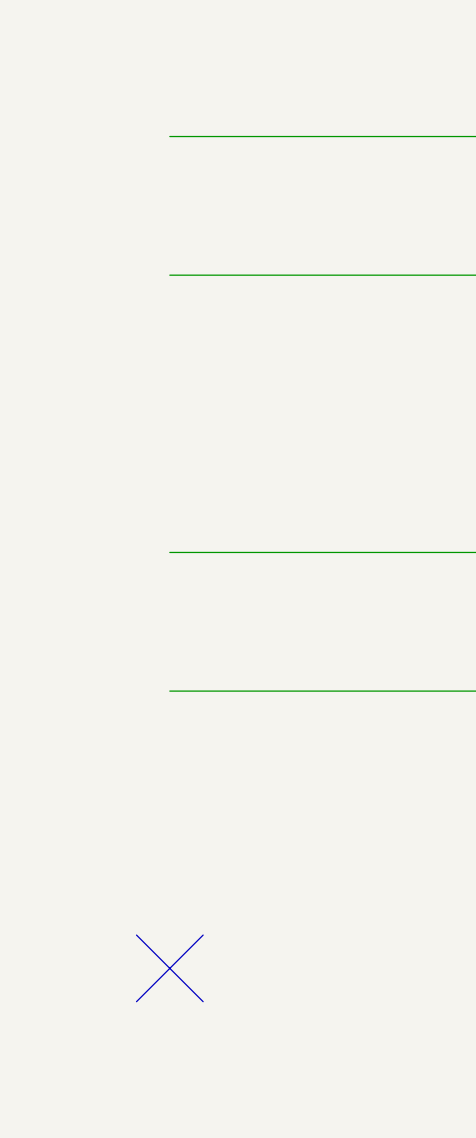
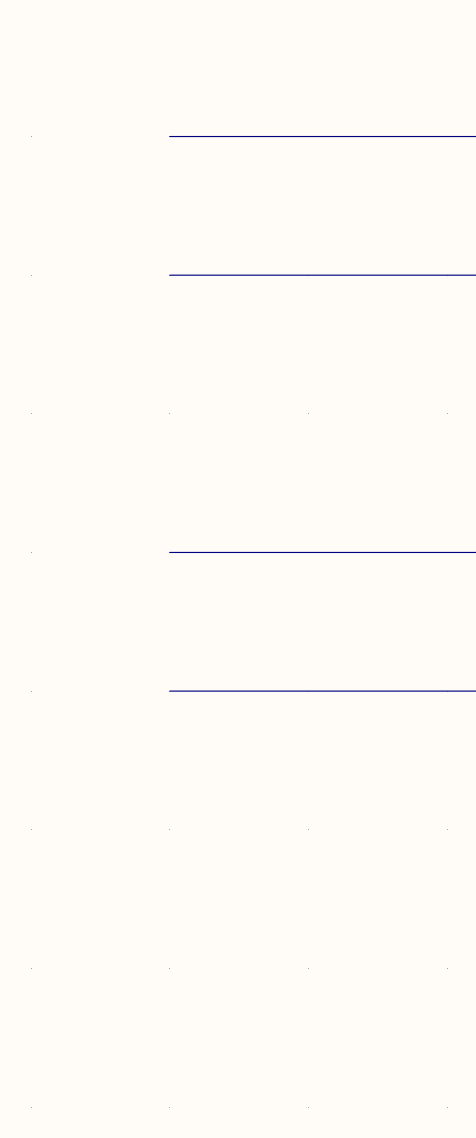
no-connect mark: (169, 968) -> none

